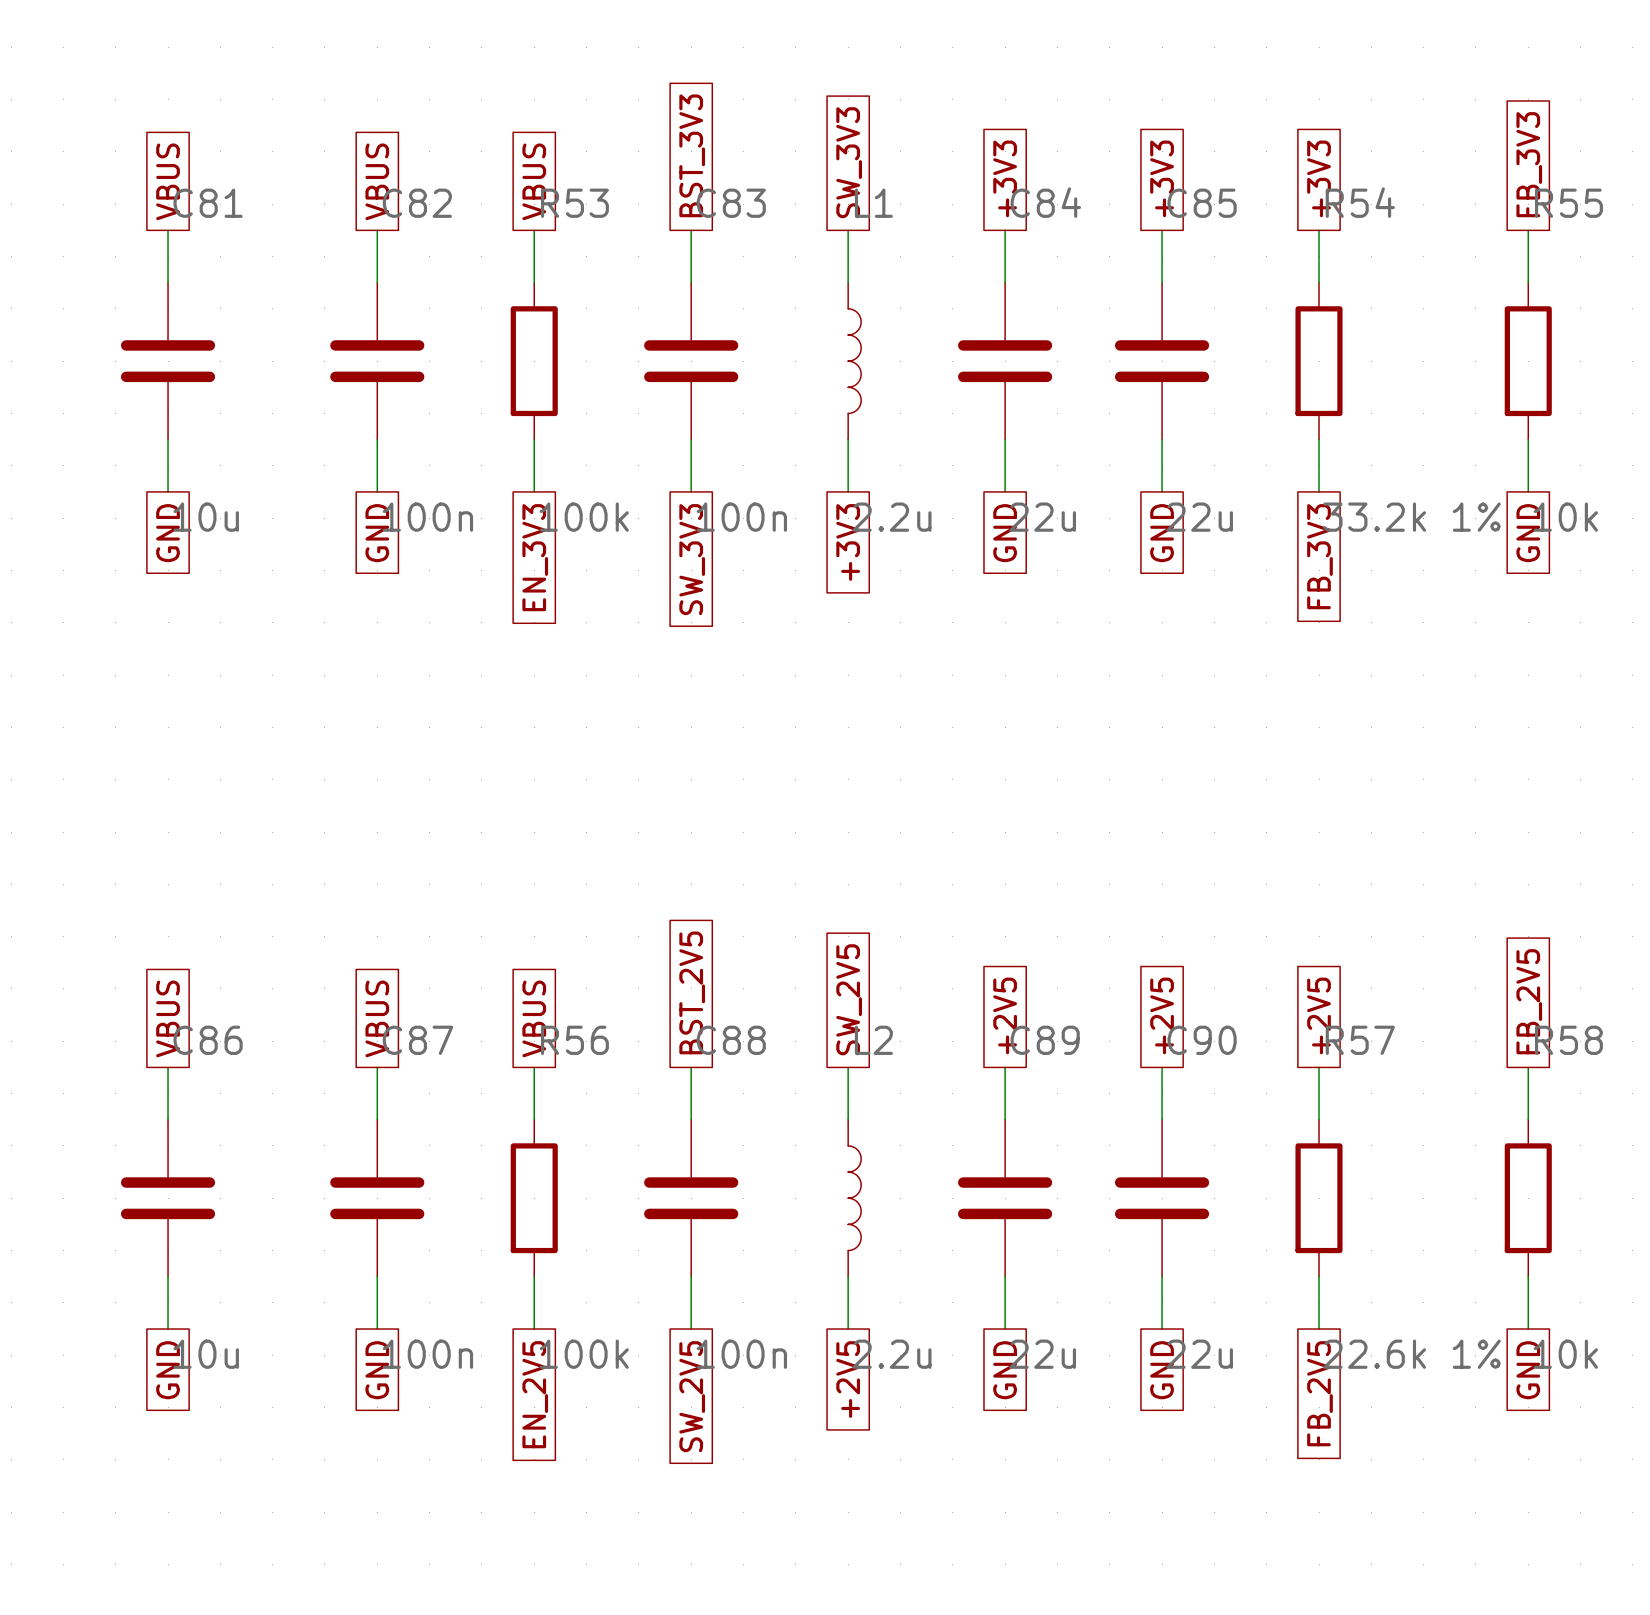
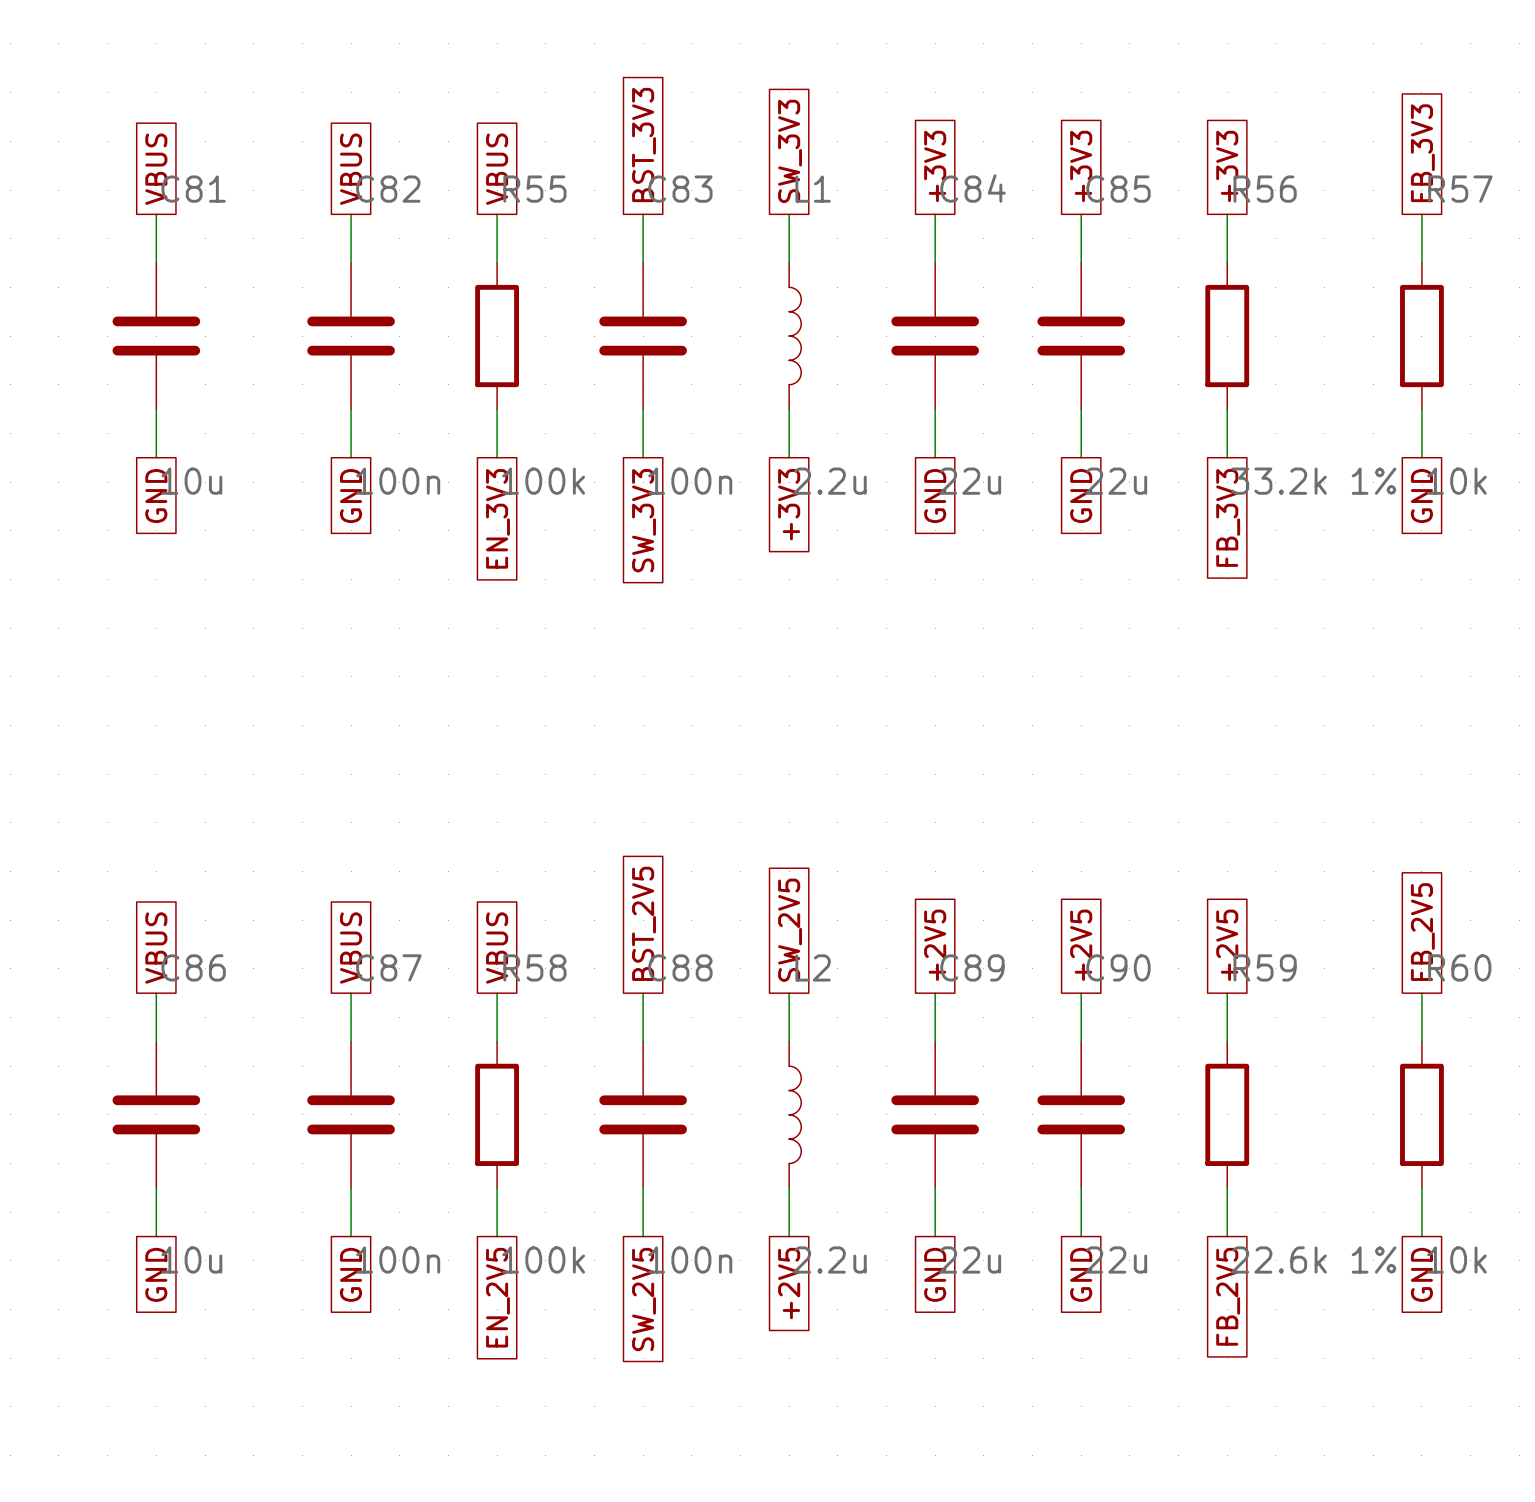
R54 name: R54 (1360, 202) -> R56 (1265, 189)
R53 name: R53 (574, 203) -> R55 (534, 189)
R55 name: R55 (1568, 203) -> R57 (1460, 189)
R56 name: R56 (574, 1040) -> R58 (534, 967)
R57 name: R57 (1360, 1040) -> R59 (1265, 967)
R58 name: R58 (1568, 1040) -> R60 (1459, 967)

